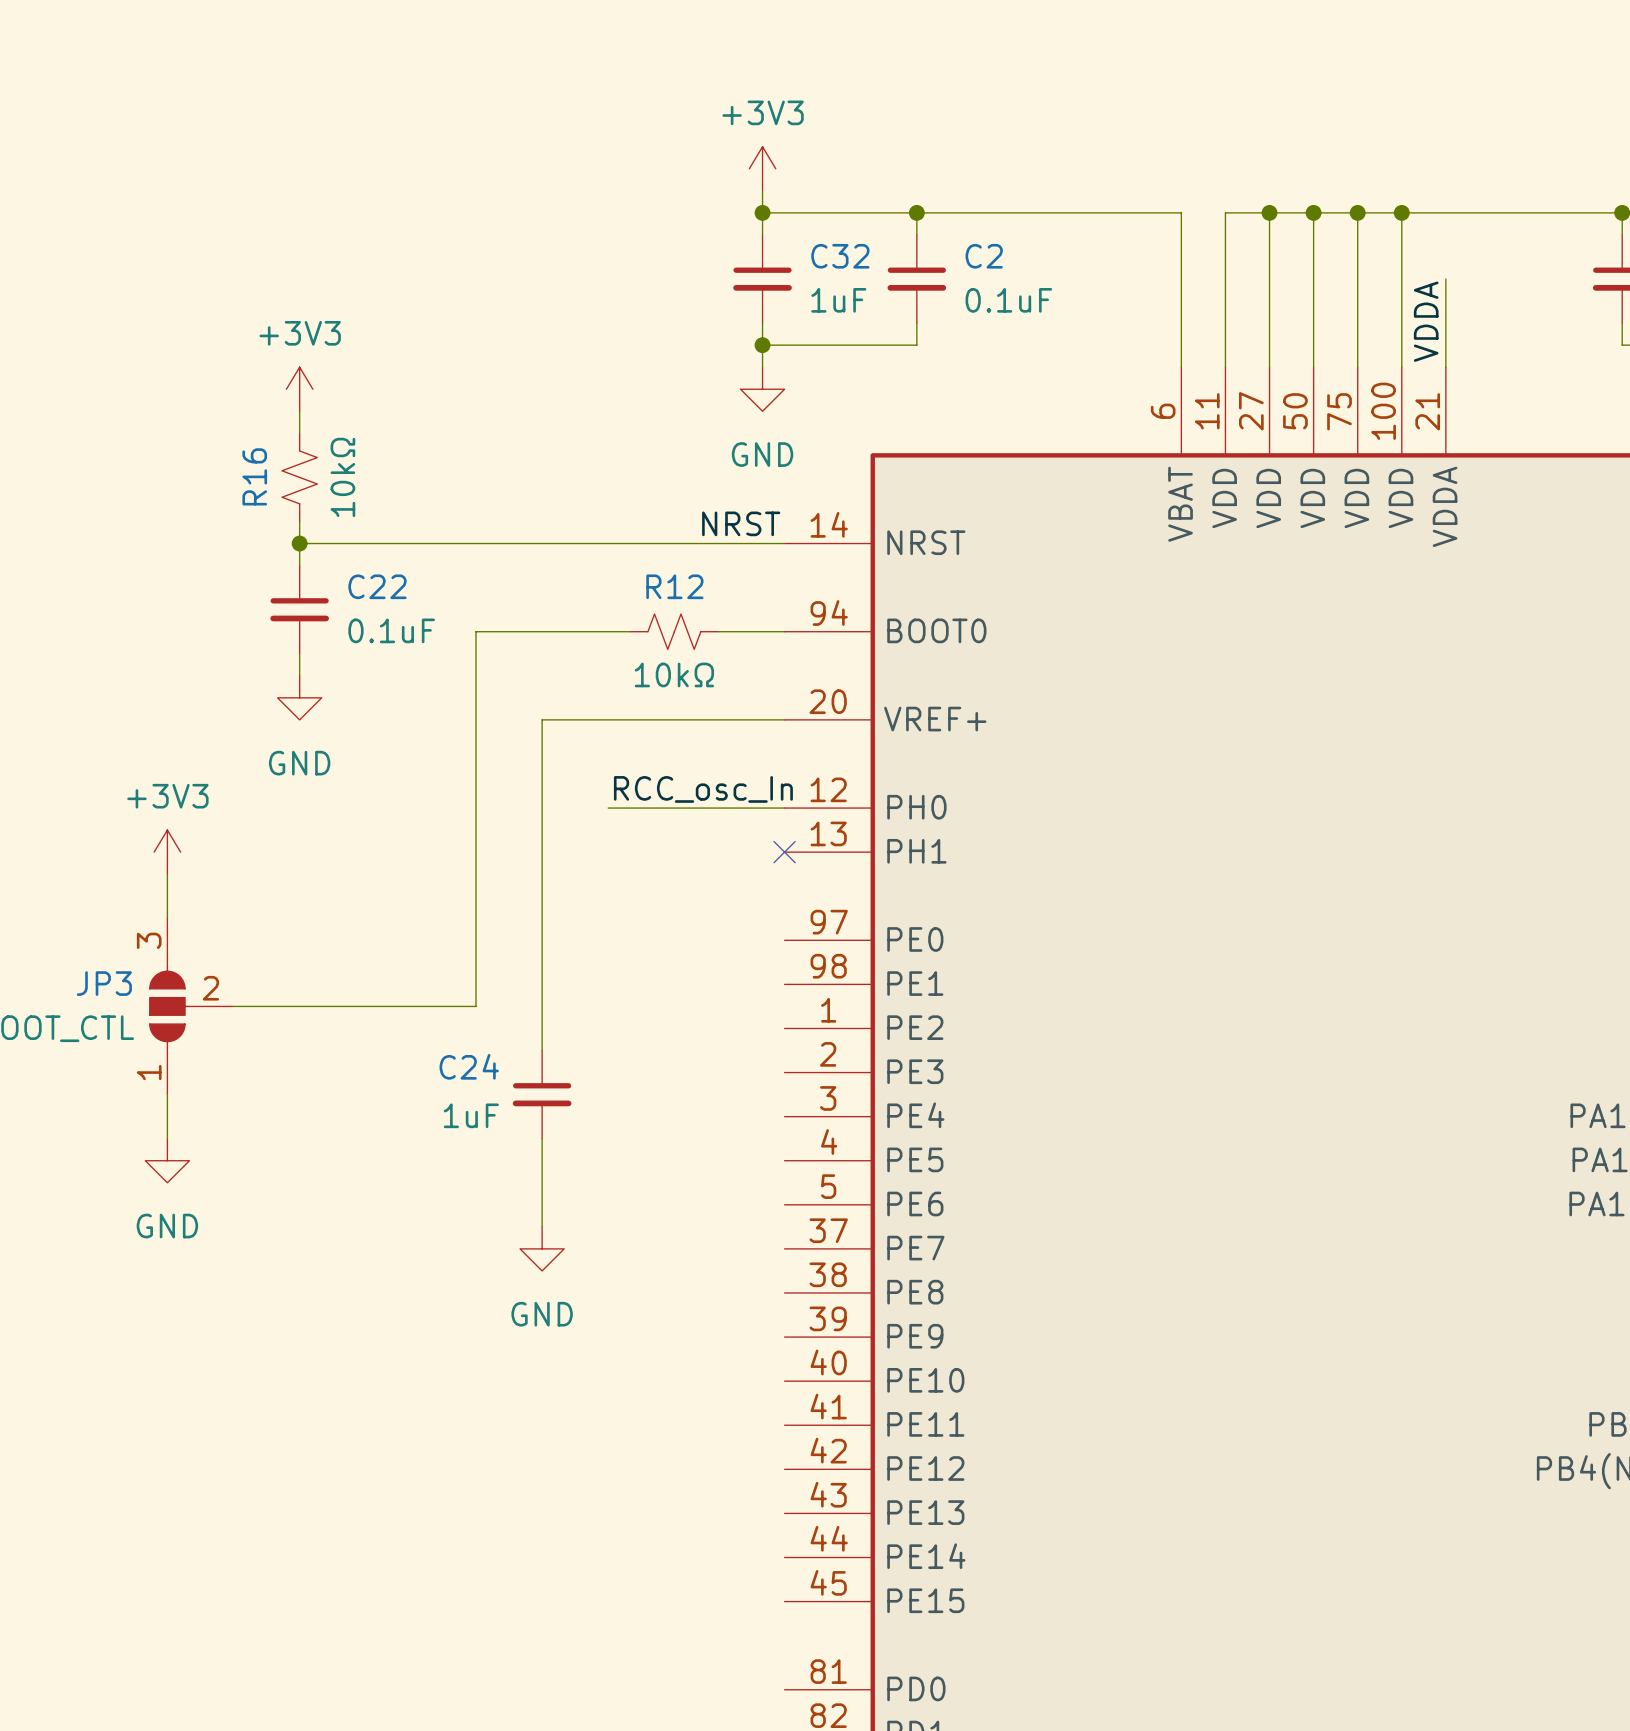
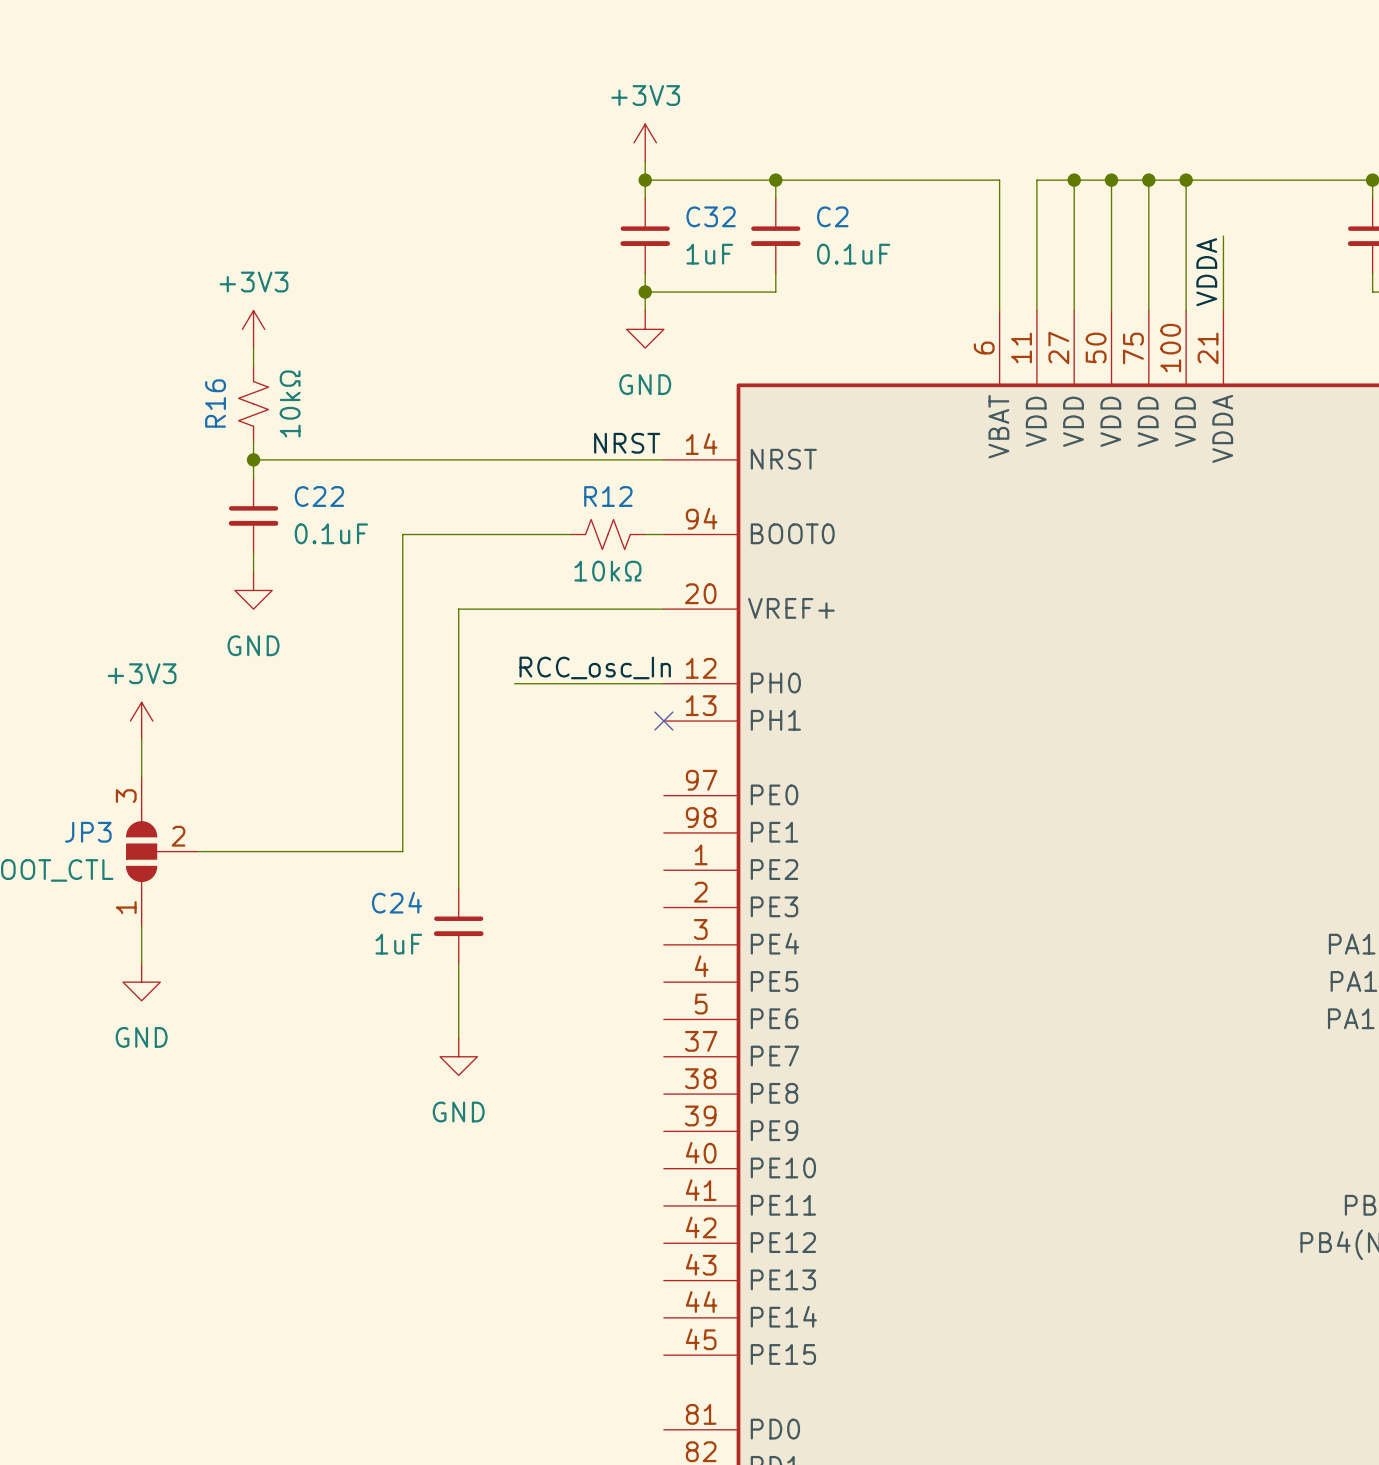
R12 position: (674, 631) -> (607, 534)
wire: (718, 631) (762, 631) -> (533, 534) (570, 534)

